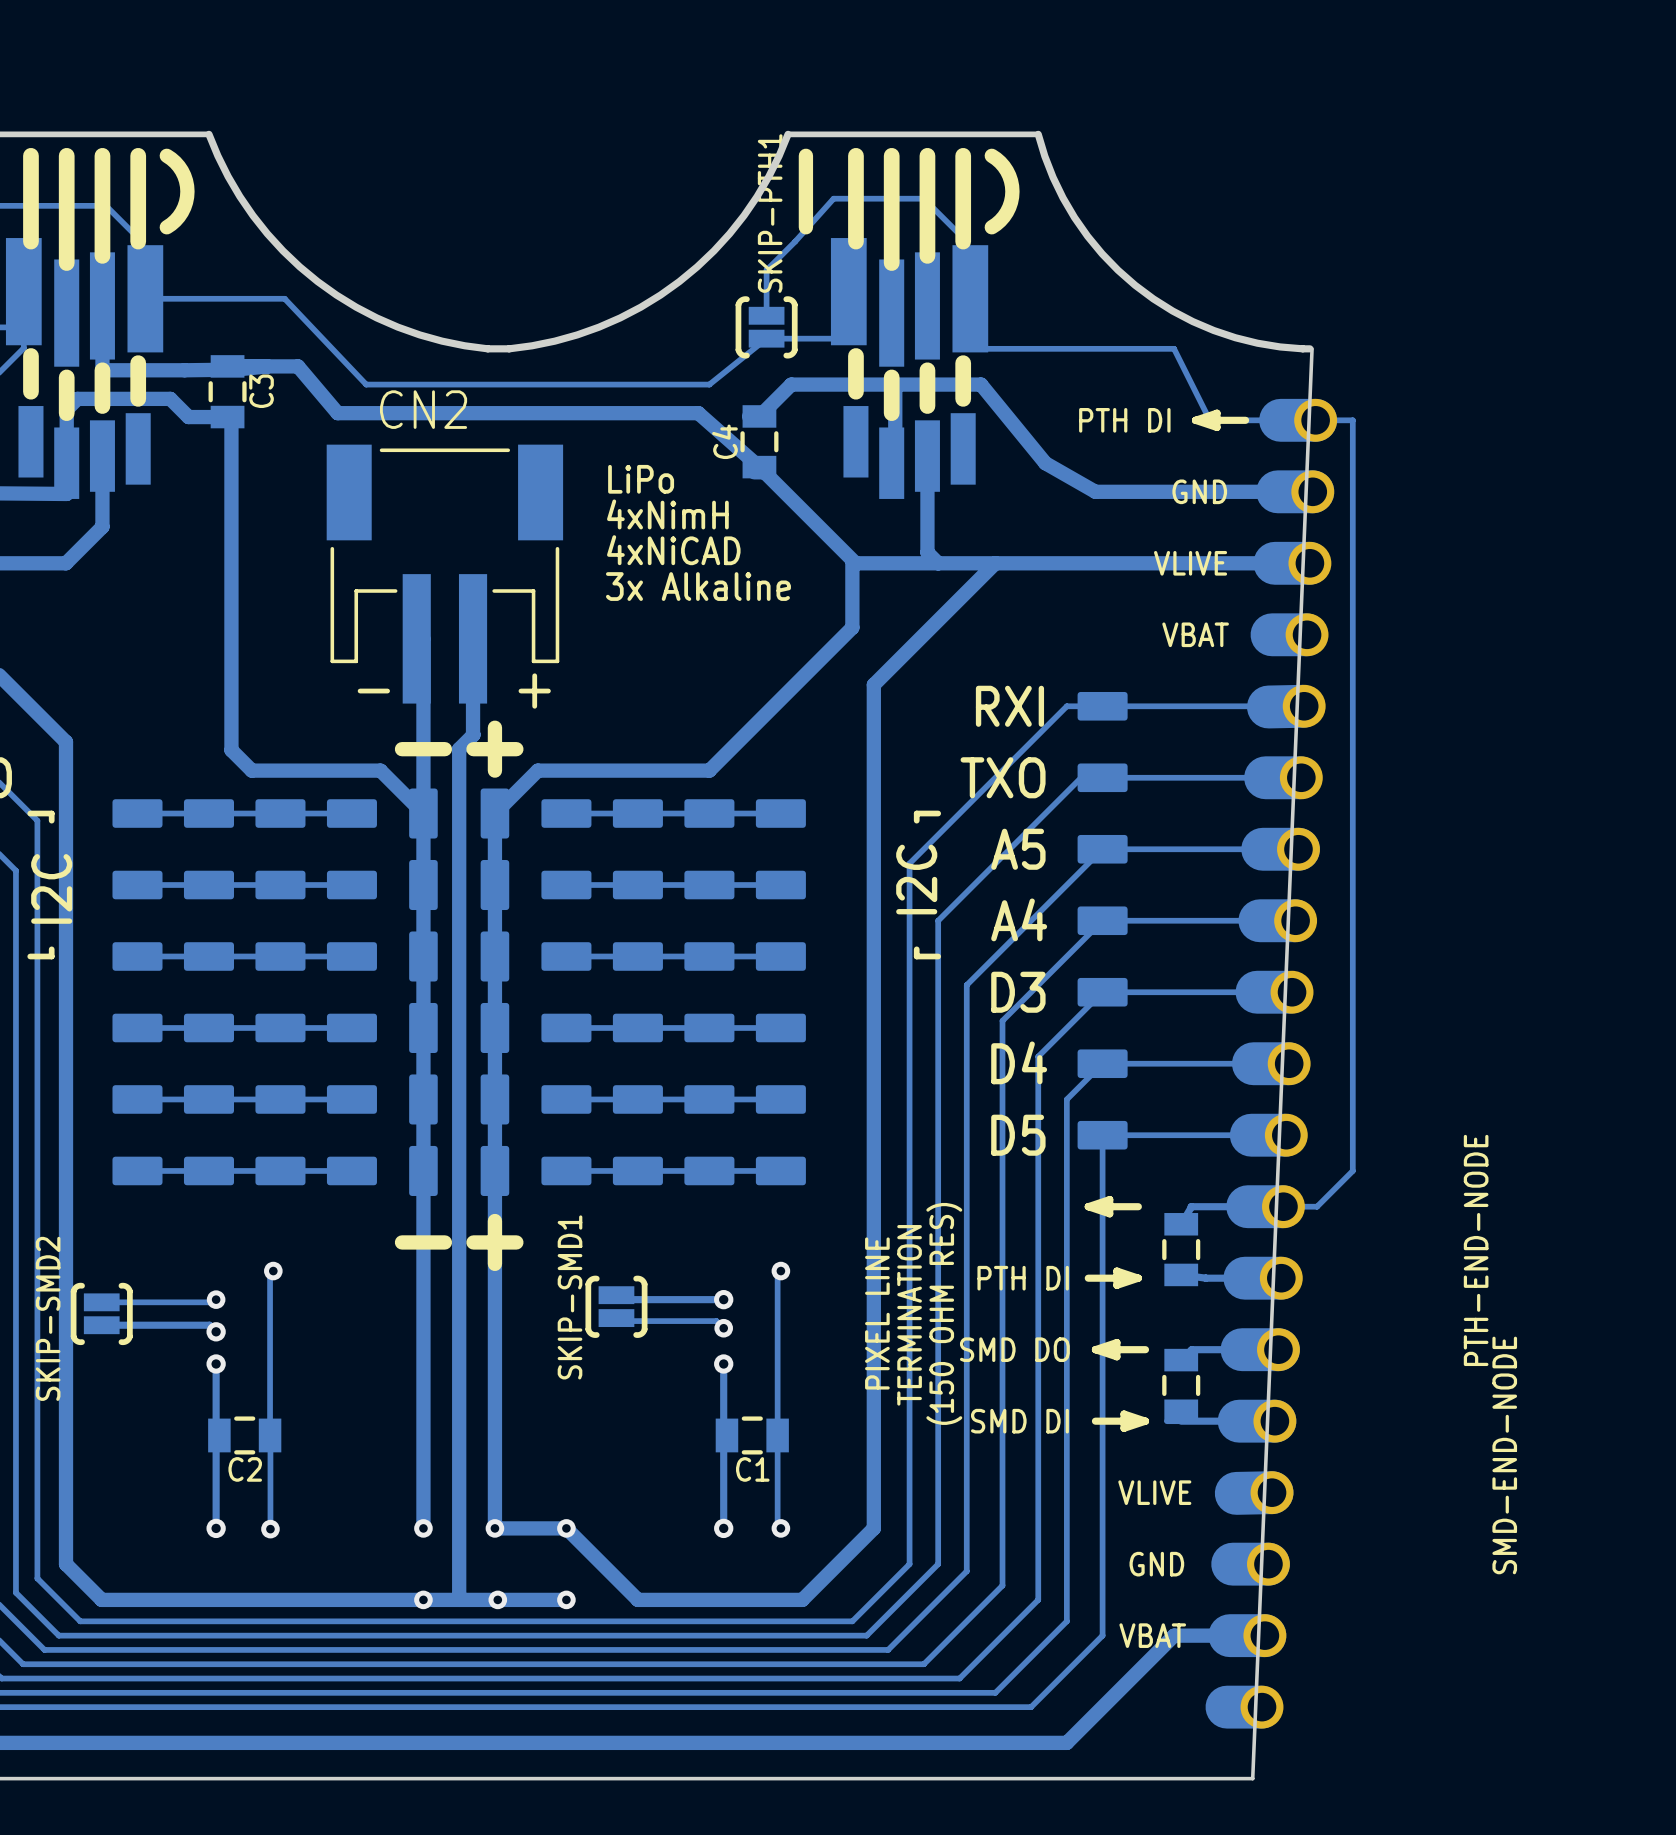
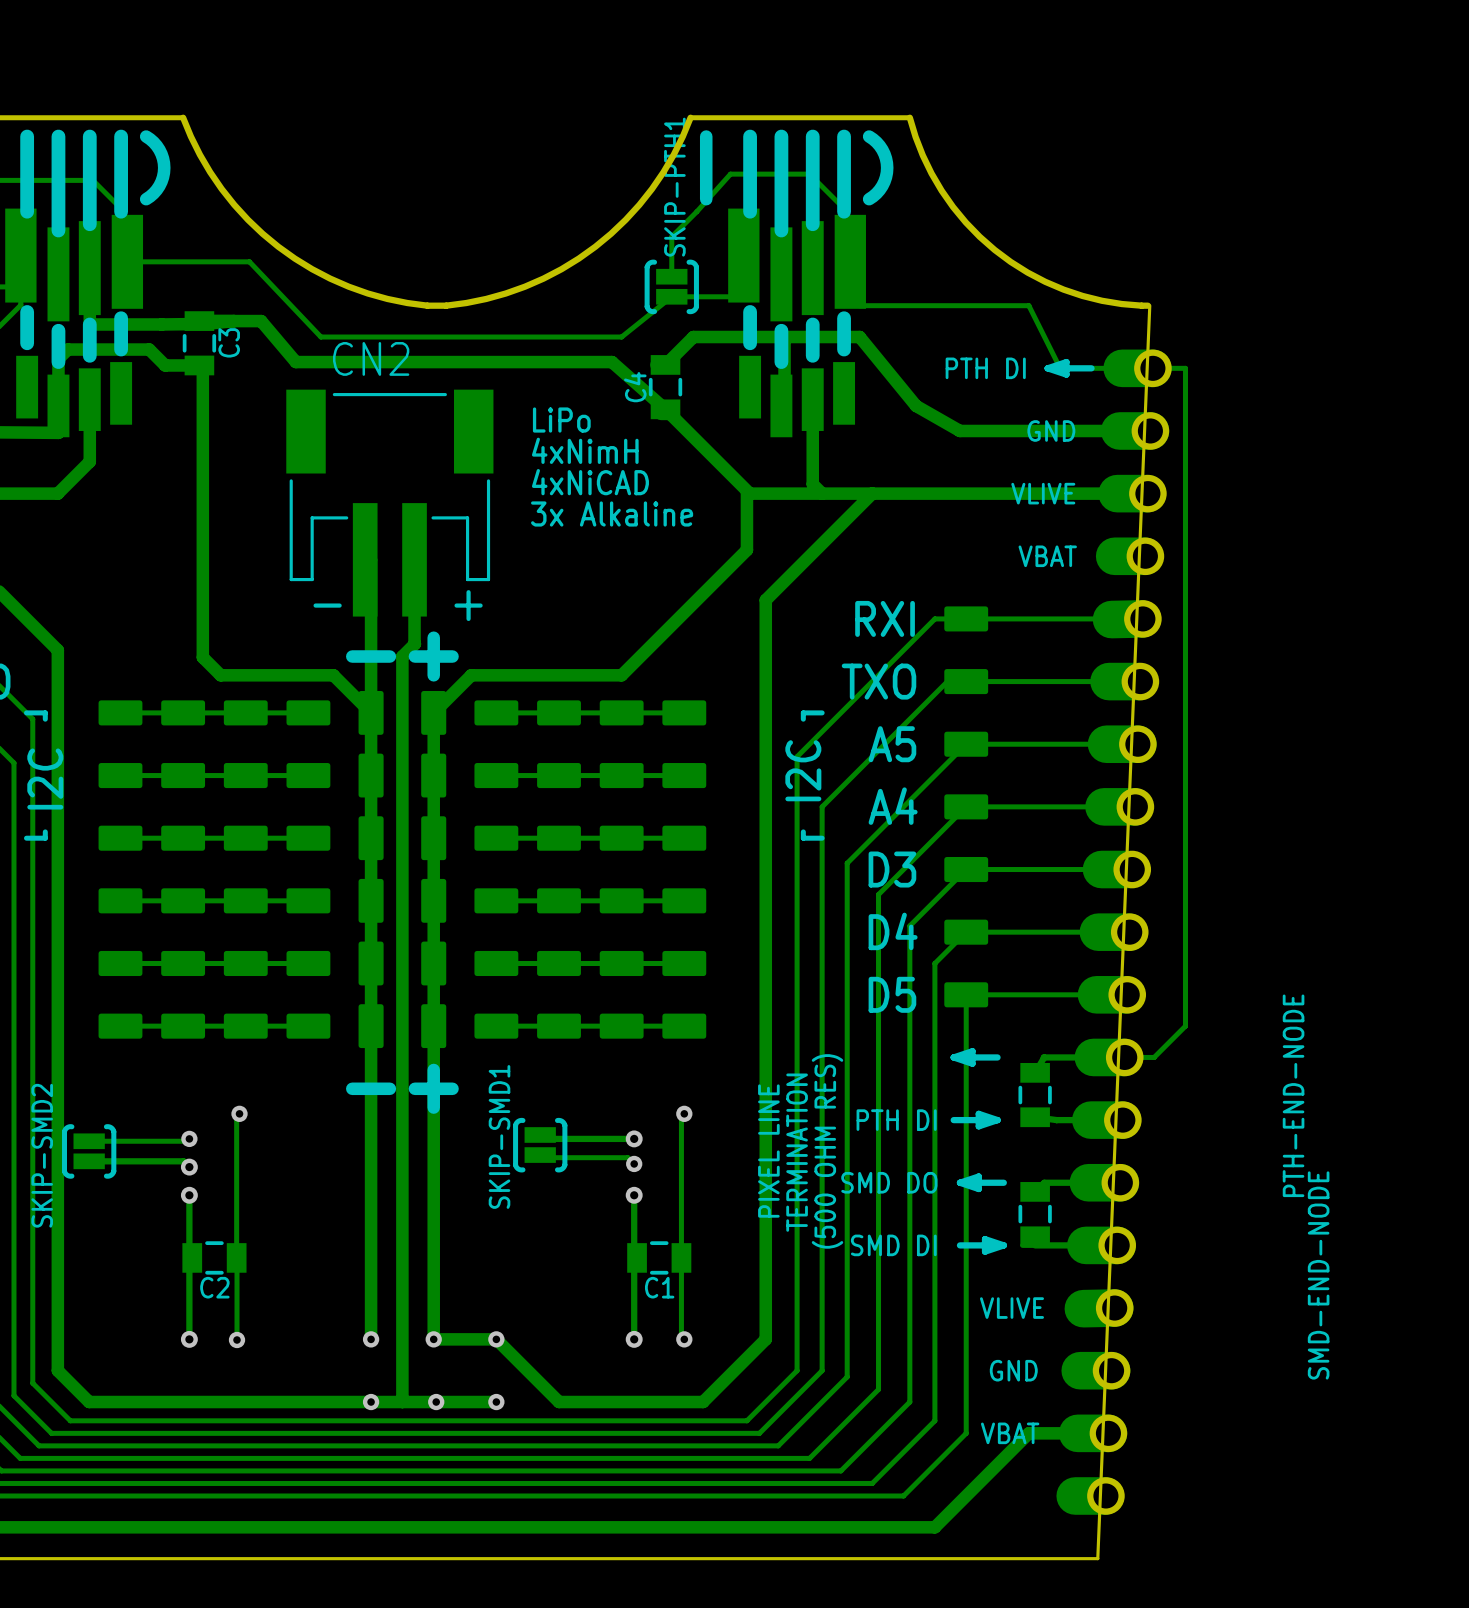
text: (150 OHM RES) (944, 1313) -> (500 OHM RES) (827, 1151)

